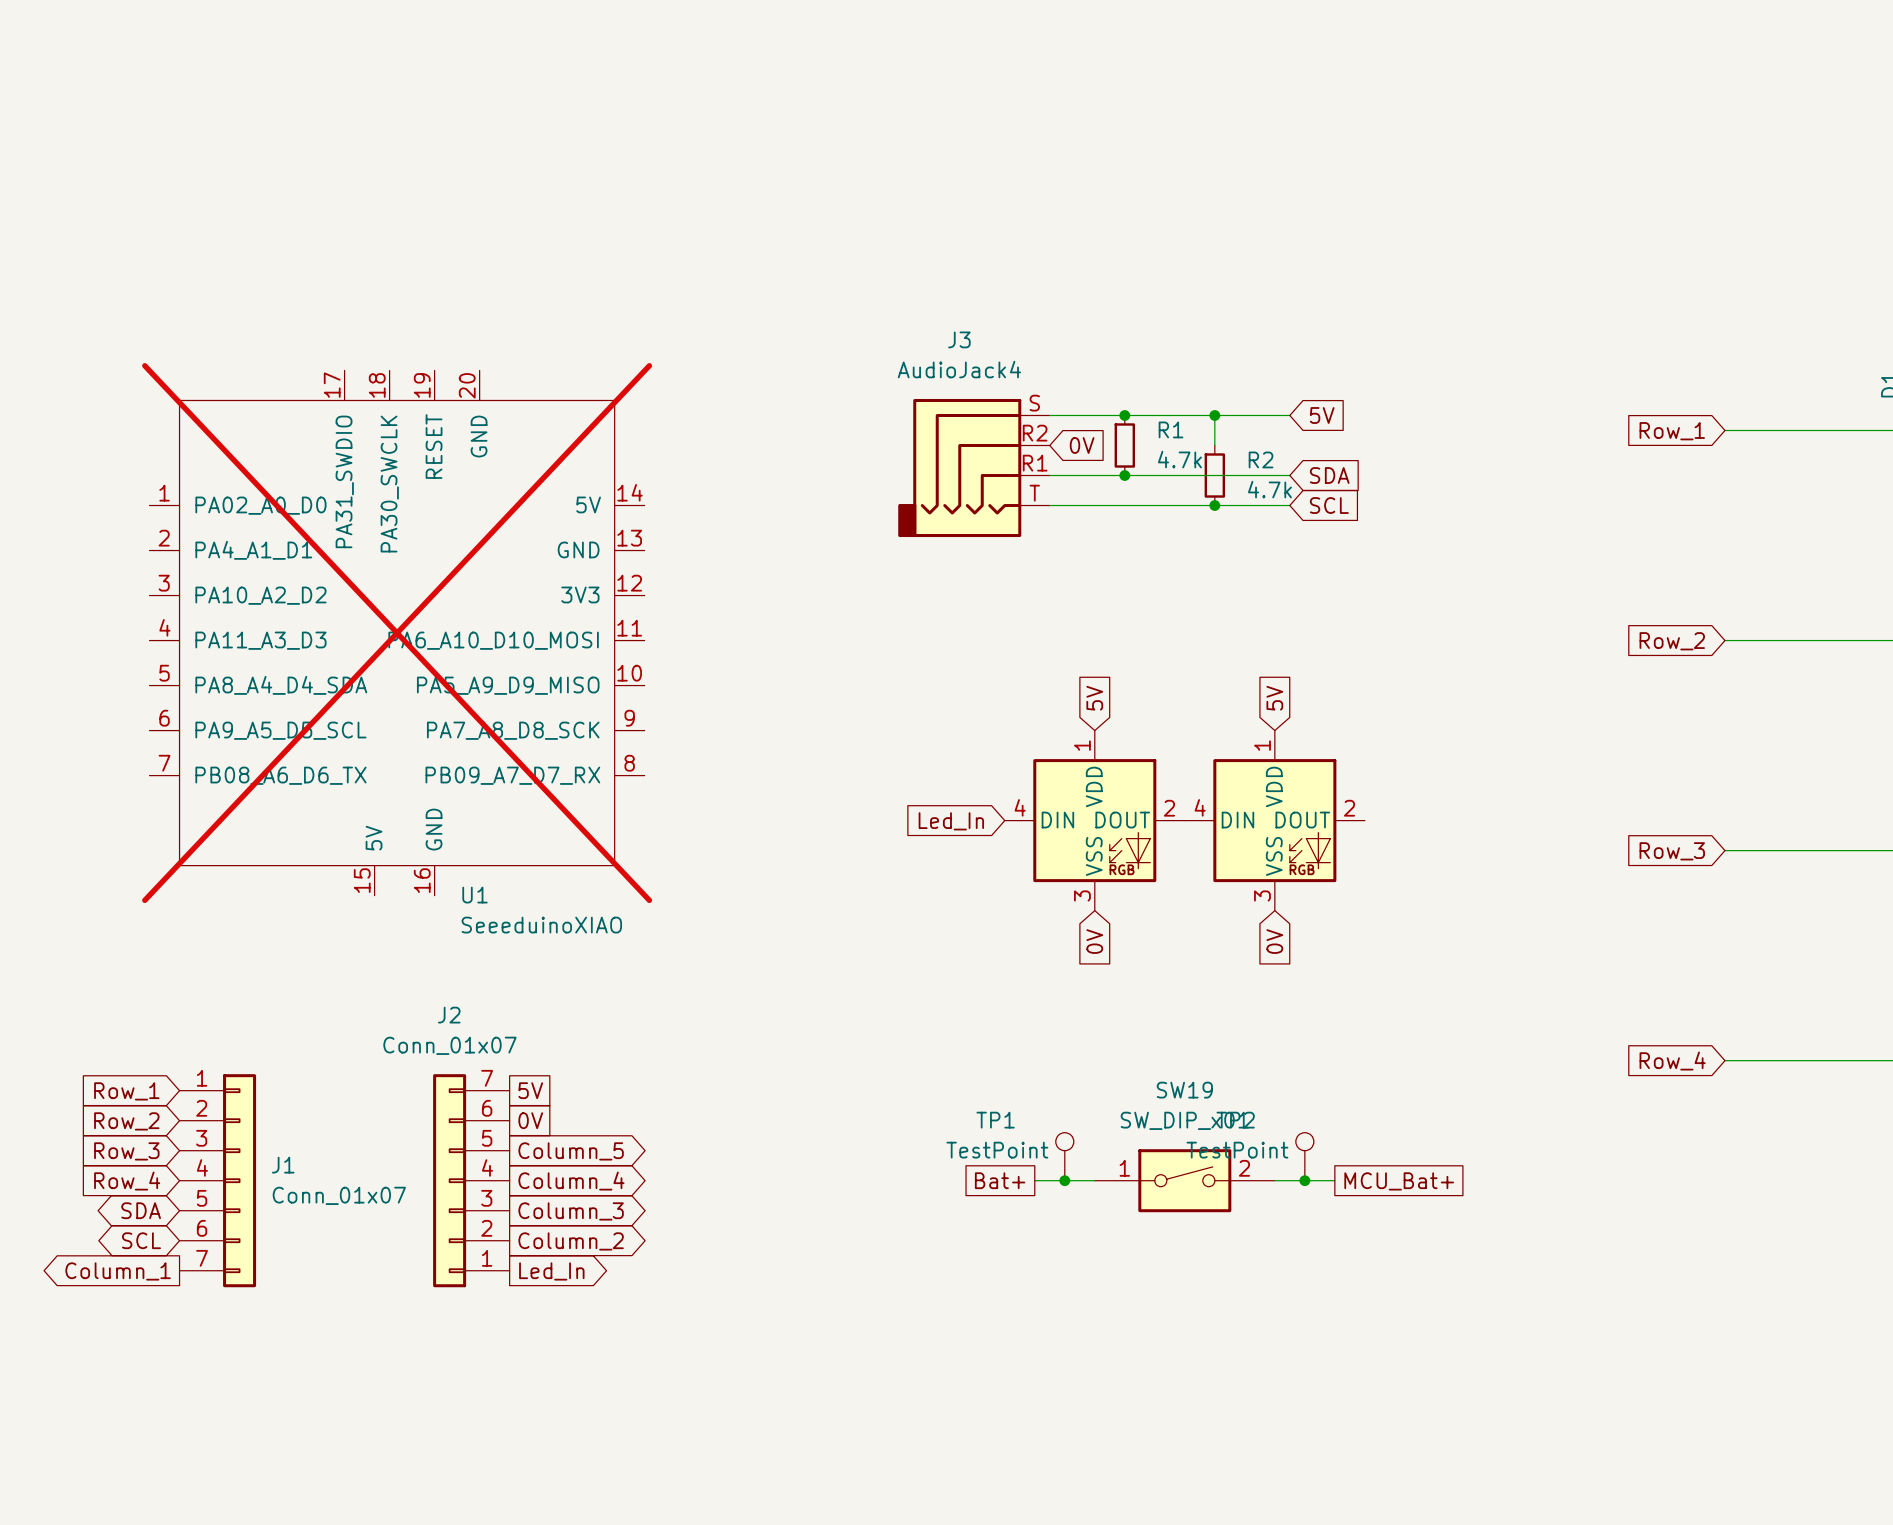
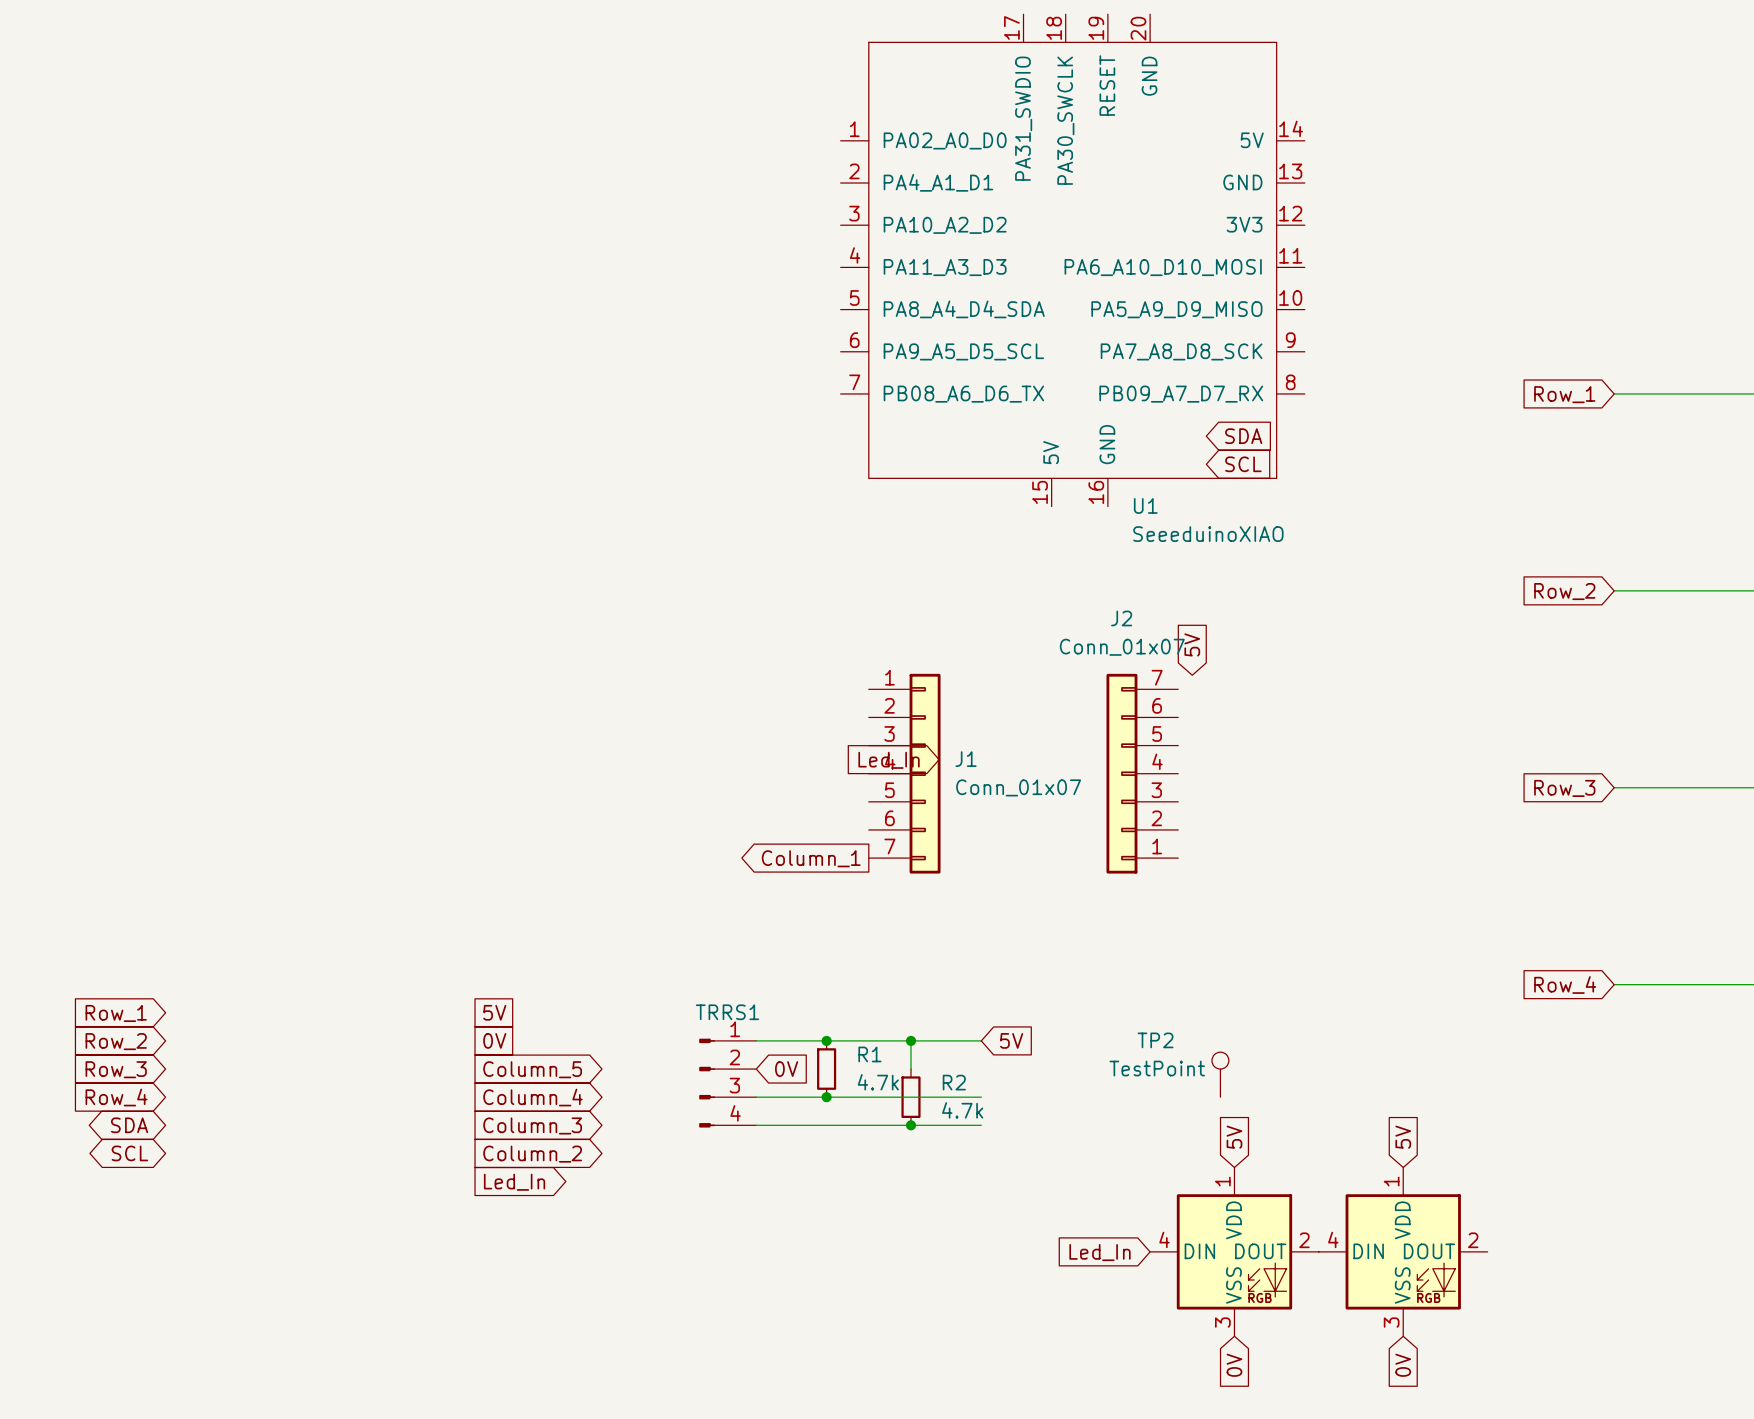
wire: (1049, 415) (1289, 415) -> none
junction: (1124, 415) -> none
wire: (1214, 415) (1214, 445) -> none
junction: (1214, 415) -> none
global label: 5V (1322, 415) -> none
global label: 0V (1082, 445) -> none
R1 position: (1124, 445) -> (826, 1069)
J3: AudioJack4 (974, 468) -> none
wire: (1049, 475) (1289, 475) -> none
junction: (1124, 475) -> none
R2 position: (1214, 475) -> (911, 1097)
wire: (1049, 505) (1289, 505) -> none
junction: (1214, 505) -> none
U1 position: (397, 633) -> (1072, 260)
U1 do-not-place cross: (397, 633) -> none
global label: 5V (1094, 698) -> none
part: (1094, 820) -> none
part: (1274, 820) -> none
global label: none -> Column_1 (811, 858)
global label: 0V (1094, 941) -> none
global label: 0V (1274, 941) -> none
wire: none -> (756, 1040) (981, 1040)
junction: none -> (826, 1040)
wire: none -> (911, 1040) (911, 1069)
junction: none -> (911, 1040)
global label: none -> 5V (1011, 1040)
global label: none -> 0V (786, 1069)
TP1: TestPoint (1064, 1156) -> none
TRRS1: none -> (727, 1083)
J1 position: (217, 1180) -> (904, 773)
J2 position: (471, 1180) -> (1142, 773)
wire: none -> (756, 1097) (967, 1097)
junction: none -> (826, 1097)
global label: Bat+ (1000, 1180) -> none
wire: (1049, 1180) (1094, 1180) -> none
junction: (1064, 1180) -> none
SW19: SW_DIP_x01 (1184, 1180) -> none
wire: (1274, 1180) (1334, 1180) -> none
junction: (1304, 1180) -> none
global label: MCU_Bat+ (1399, 1181) -> none
wire: none -> (756, 1125) (981, 1125)
junction: none -> (911, 1125)
global label: none -> 5V (1234, 1137)
global label: none -> 5V (1403, 1137)
global label: Column_1 (118, 1271) -> none
part: none -> (1234, 1251)
part: none -> (1403, 1251)
global label: none -> Led_In (1100, 1252)
global label: none -> 0V (1234, 1365)
global label: none -> 0V (1403, 1365)

